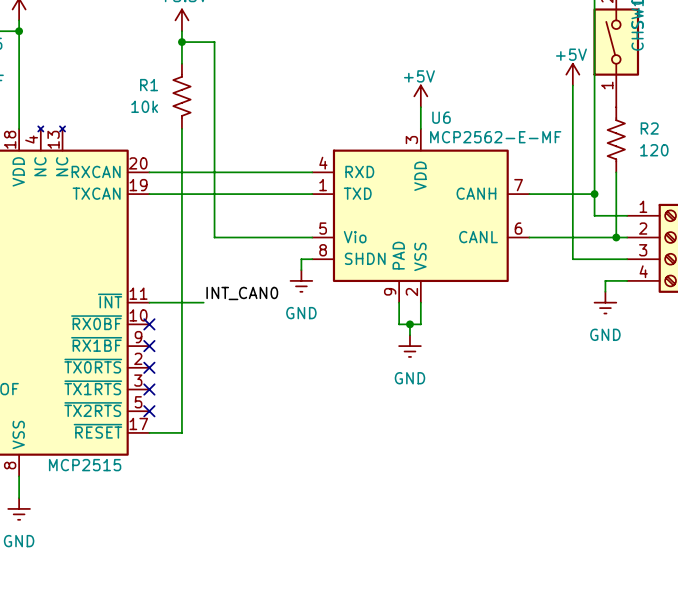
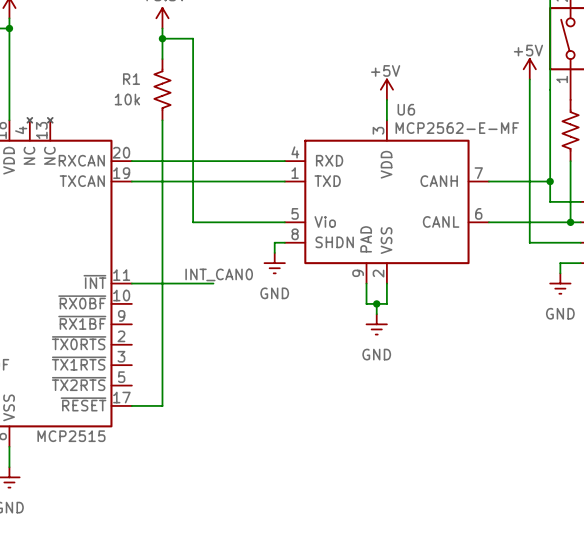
wire: none -> (182, 283) (213, 283)
no-connect mark: (149, 324) -> none
no-connect mark: (149, 346) -> none
no-connect mark: (149, 367) -> none
no-connect mark: (149, 389) -> none
no-connect mark: (149, 411) -> none

